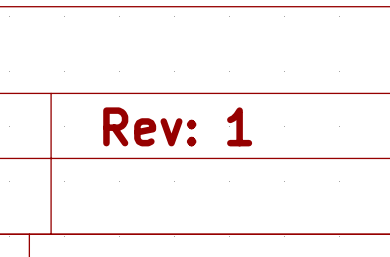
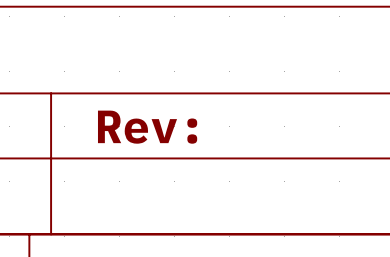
title block: Rev: 1 (177, 126) -> Rev: (147, 127)

